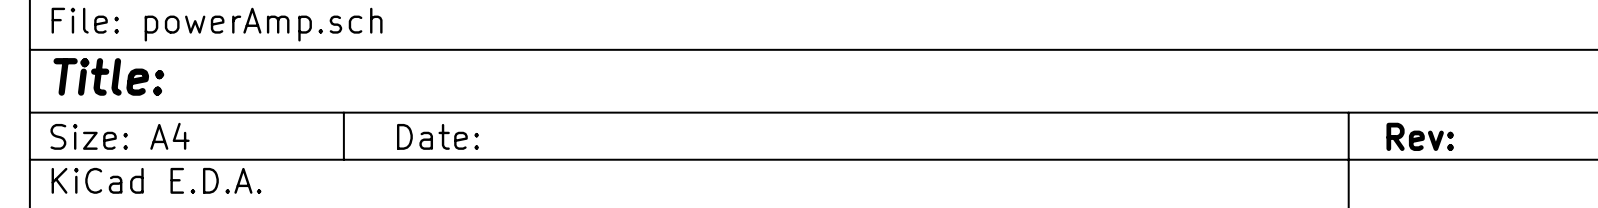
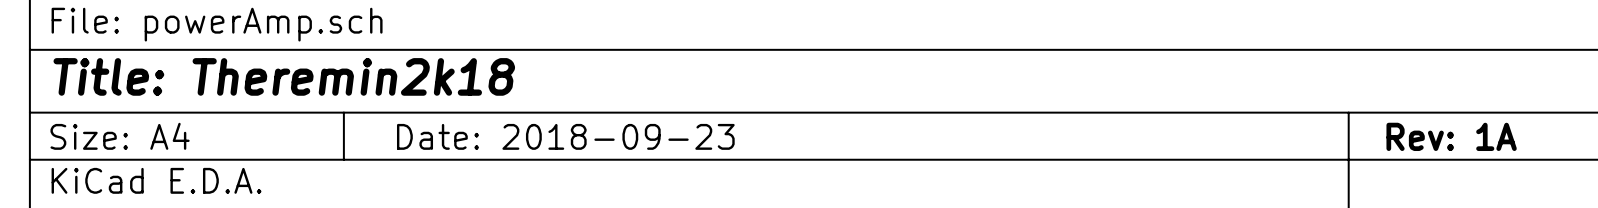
title block: Title: (108, 76) -> Title: Theremin2k18 (284, 76)
title block: Date: (437, 136) -> Date: 2018-09-23 (565, 136)
title block: Rev: (1420, 136) -> Rev: 1A (1451, 136)

